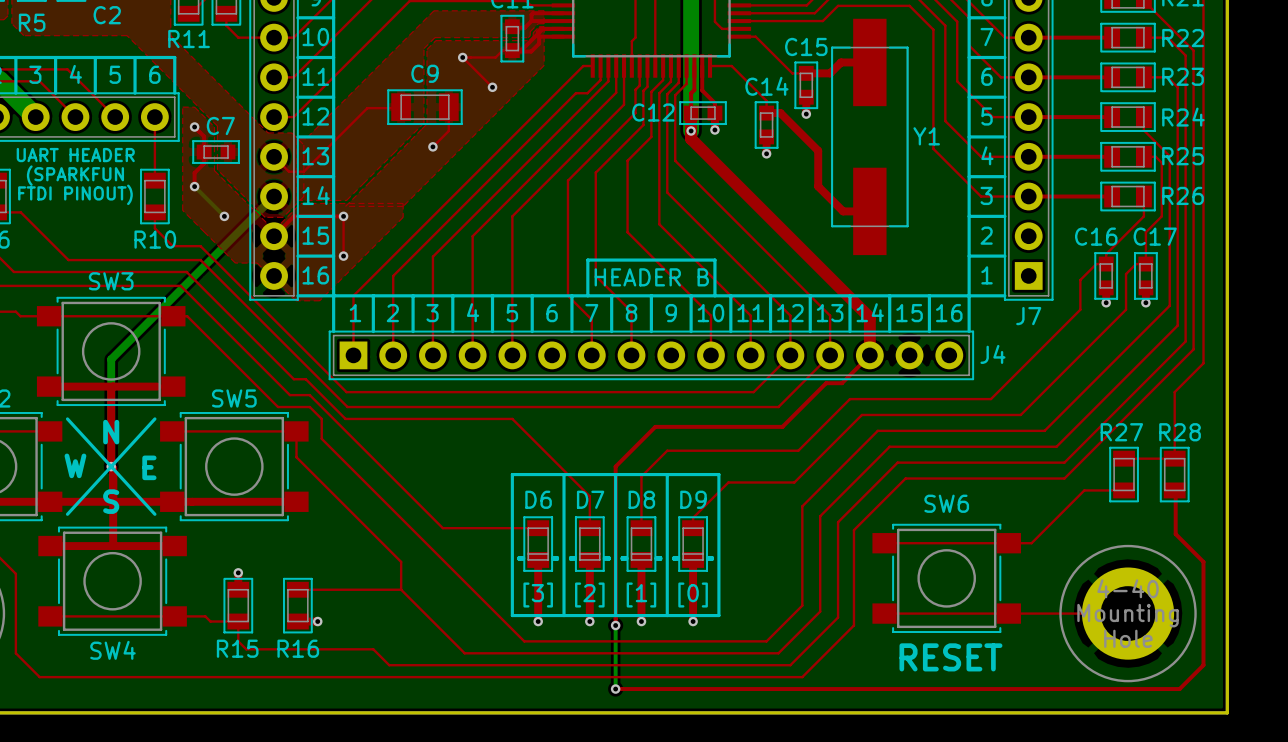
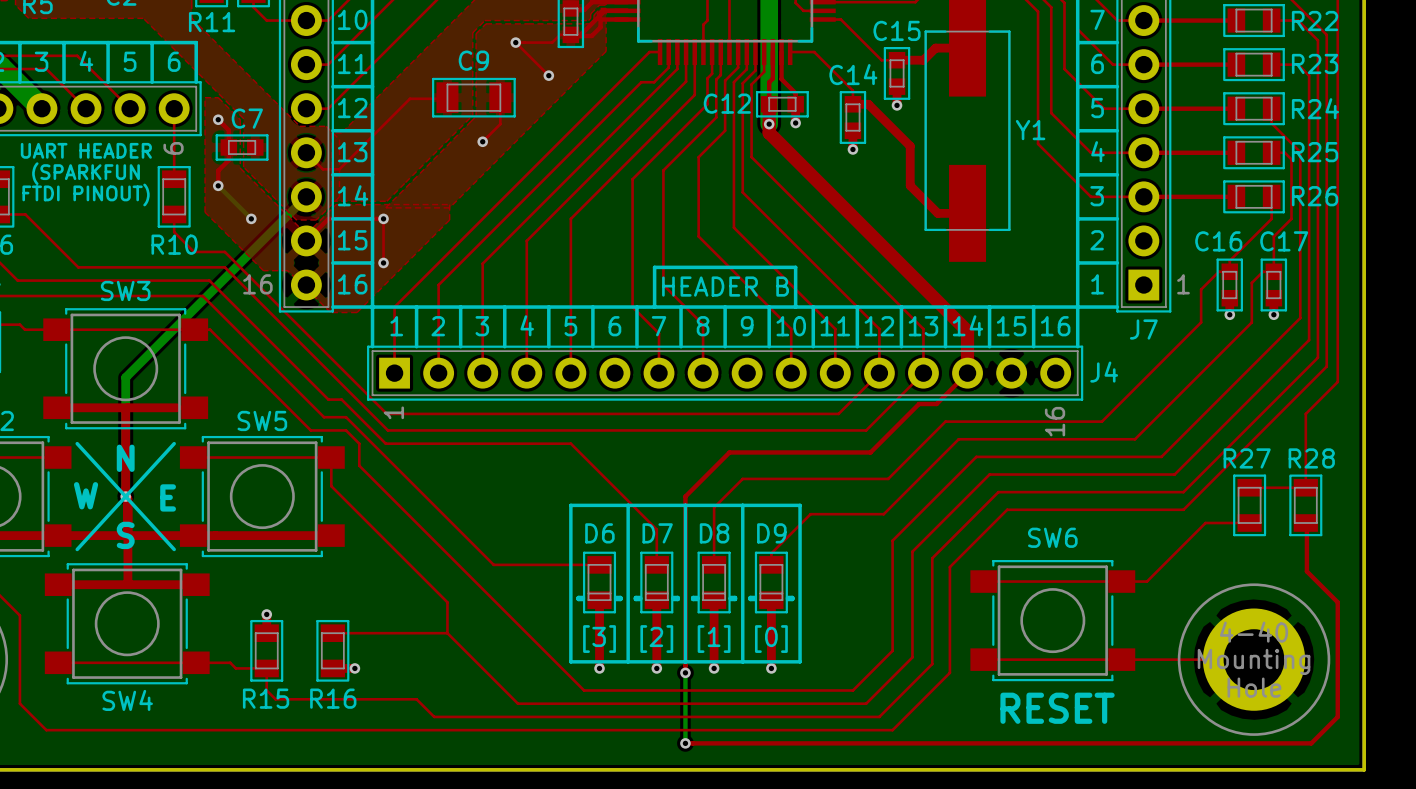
part text: none -> 6 (173, 148)
part text: none -> 16 (257, 284)
J7 text: none -> 1 (1183, 284)
J4 text: none -> 1 (393, 412)
J4 text: none -> 16 (1055, 421)

